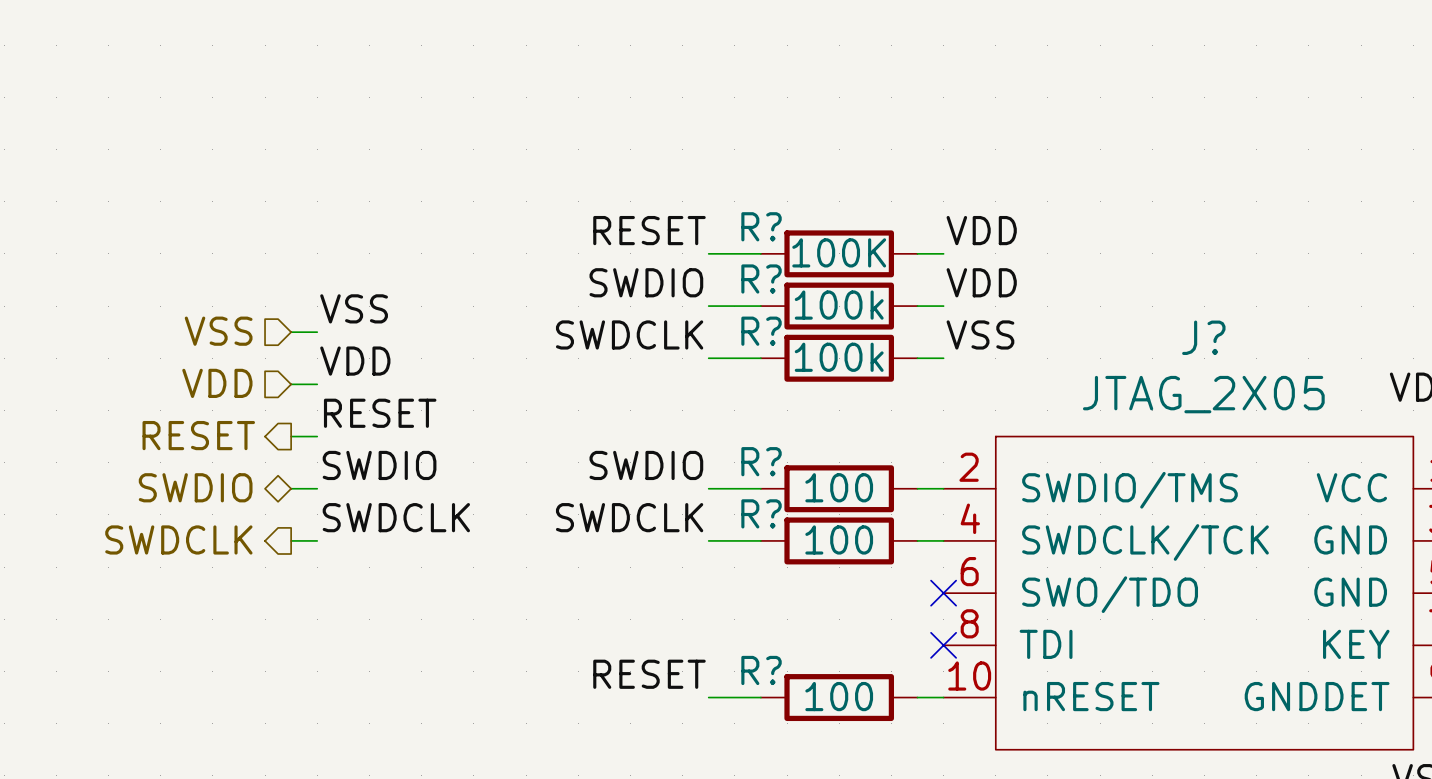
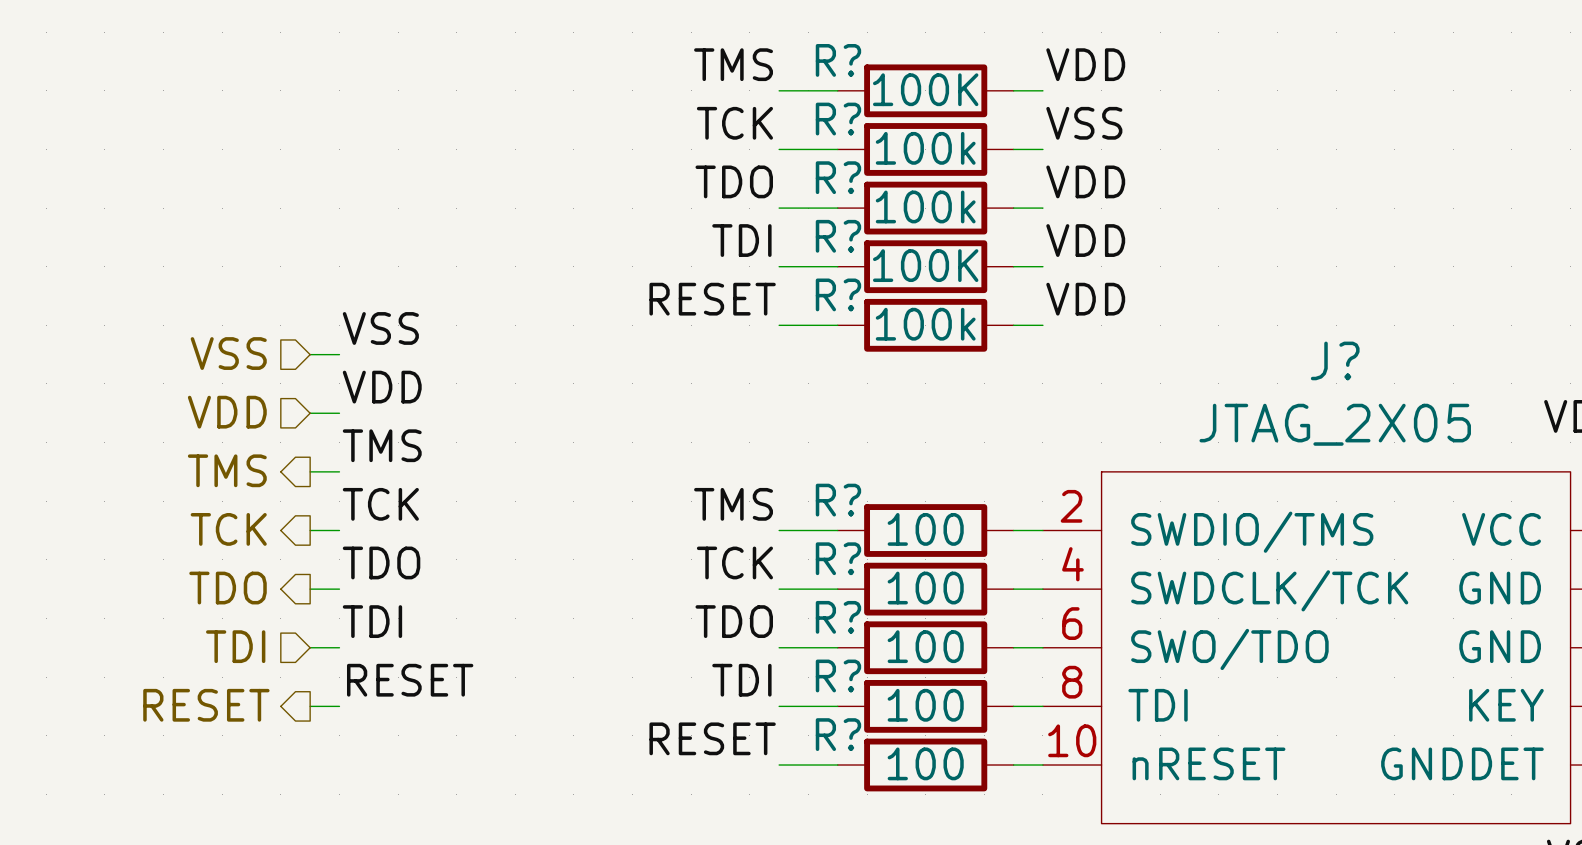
label: none -> TMS (733, 64)
label: none -> VDD (1085, 64)
wire: none -> (779, 90) (837, 90)
R?: none -> 100K (925, 90)
wire: none -> (1013, 90) (1042, 90)
label: none -> TCK (734, 123)
wire: none -> (779, 149) (837, 149)
R?: none -> 100k (925, 149)
wire: none -> (1013, 149) (1042, 149)
label: none -> TDO (734, 181)
label: none -> VDD (1085, 181)
R?: none -> 100k (925, 208)
label: RESET (649, 230) -> TDI (741, 240)
label: SWDIO (646, 282) -> RESET (712, 299)
label: SWDCLK (629, 334) -> none
label position: VSS (980, 334) -> VSS (1084, 123)
wire: (708, 358) (760, 358) -> (779, 208) (837, 208)
R?: 100k (839, 358) -> none
wire: (917, 358) (943, 358) -> (1013, 208) (1042, 208)
label: RESET (380, 413) -> TMS (382, 445)
hierarchical label: RESET (198, 435) -> TMS (227, 470)
label: SWDIO (379, 465) -> TCK (380, 504)
label: SWDIO (646, 465) -> TMS (733, 504)
hierarchical label shape: bidirectional (195, 487) -> output (228, 529)
hierarchical label: SWDIO (195, 487) -> TCK (228, 529)
label: SWDCLK (396, 517) -> TDO (381, 562)
label: SWDCLK (629, 517) -> TCK (734, 562)
hierarchical label: SWDCLK (178, 539) -> TDO (228, 588)
label: none -> TDI (372, 621)
label: none -> TDO (734, 621)
hierarchical label: none -> TDI (235, 646)
wire: none -> (310, 647) (339, 647)
wire: none -> (779, 647) (837, 647)
R?: none -> 100 (925, 647)
wire: none -> (1013, 647) (1042, 647)
no-connect mark: (943, 593) -> none
label: none -> RESET (410, 680)
label: none -> TDI (741, 680)
hierarchical label: none -> RESET (206, 705)
wire: none -> (310, 706) (339, 706)
wire: none -> (779, 706) (837, 706)
R?: none -> 100 (925, 706)
wire: none -> (1013, 706) (1042, 706)
no-connect mark: (943, 645) -> none

